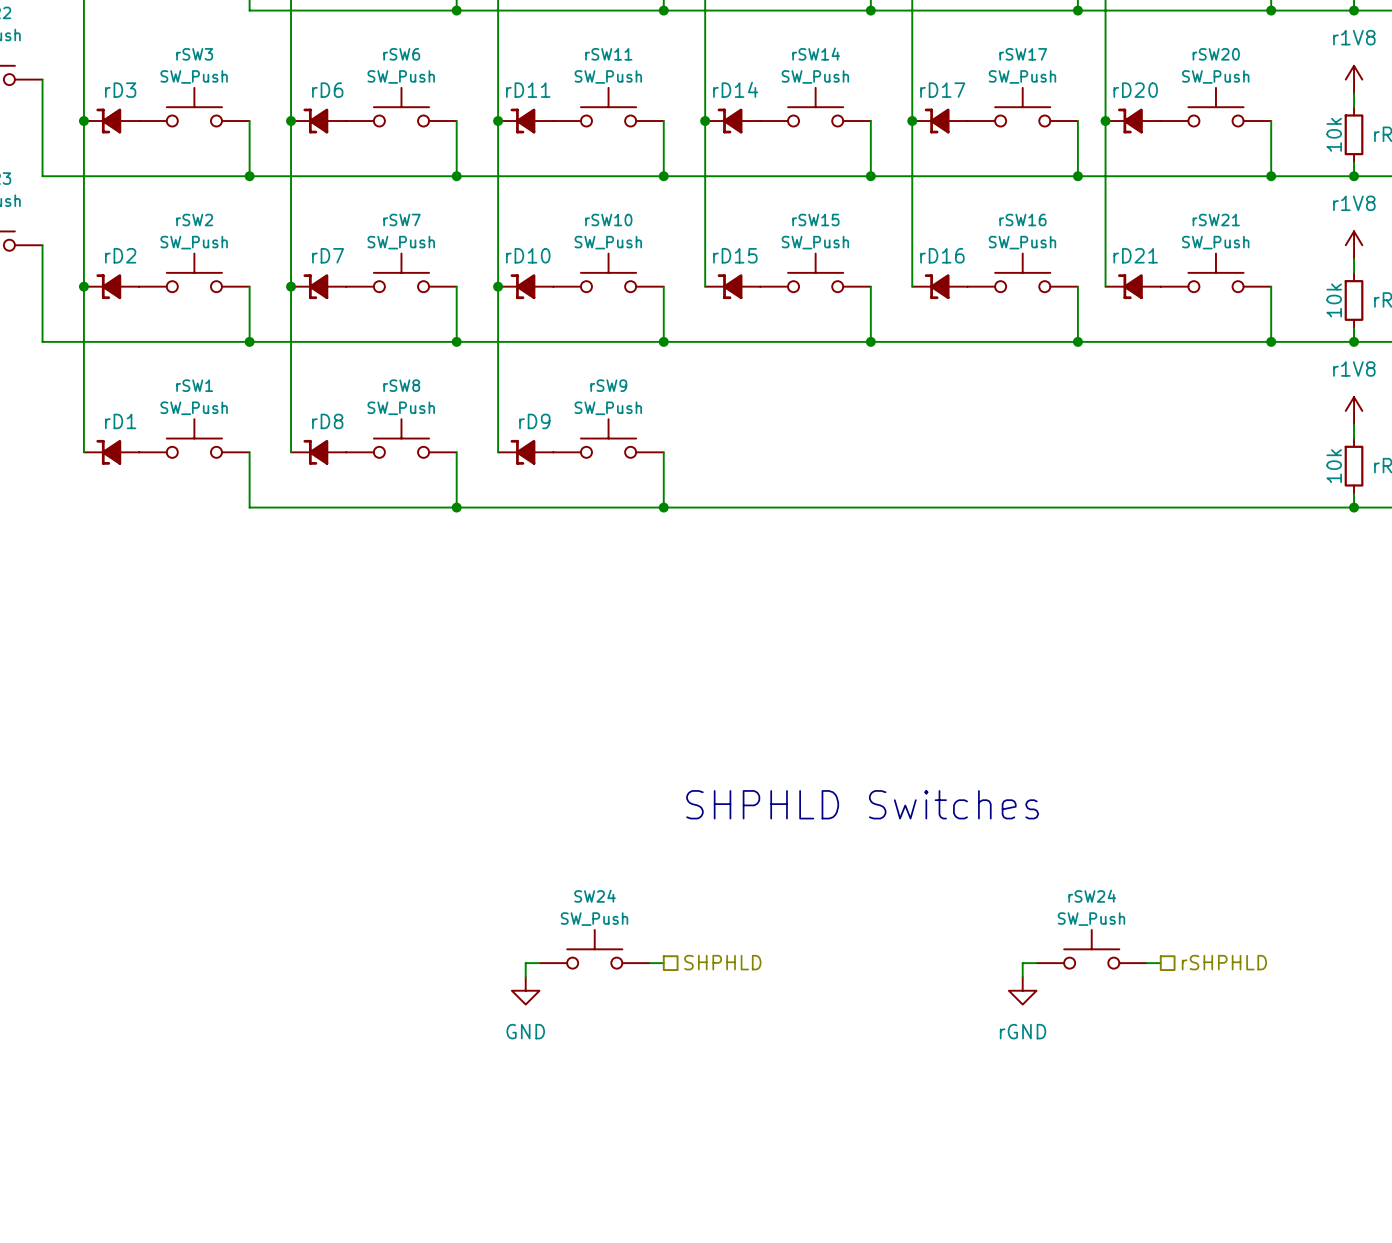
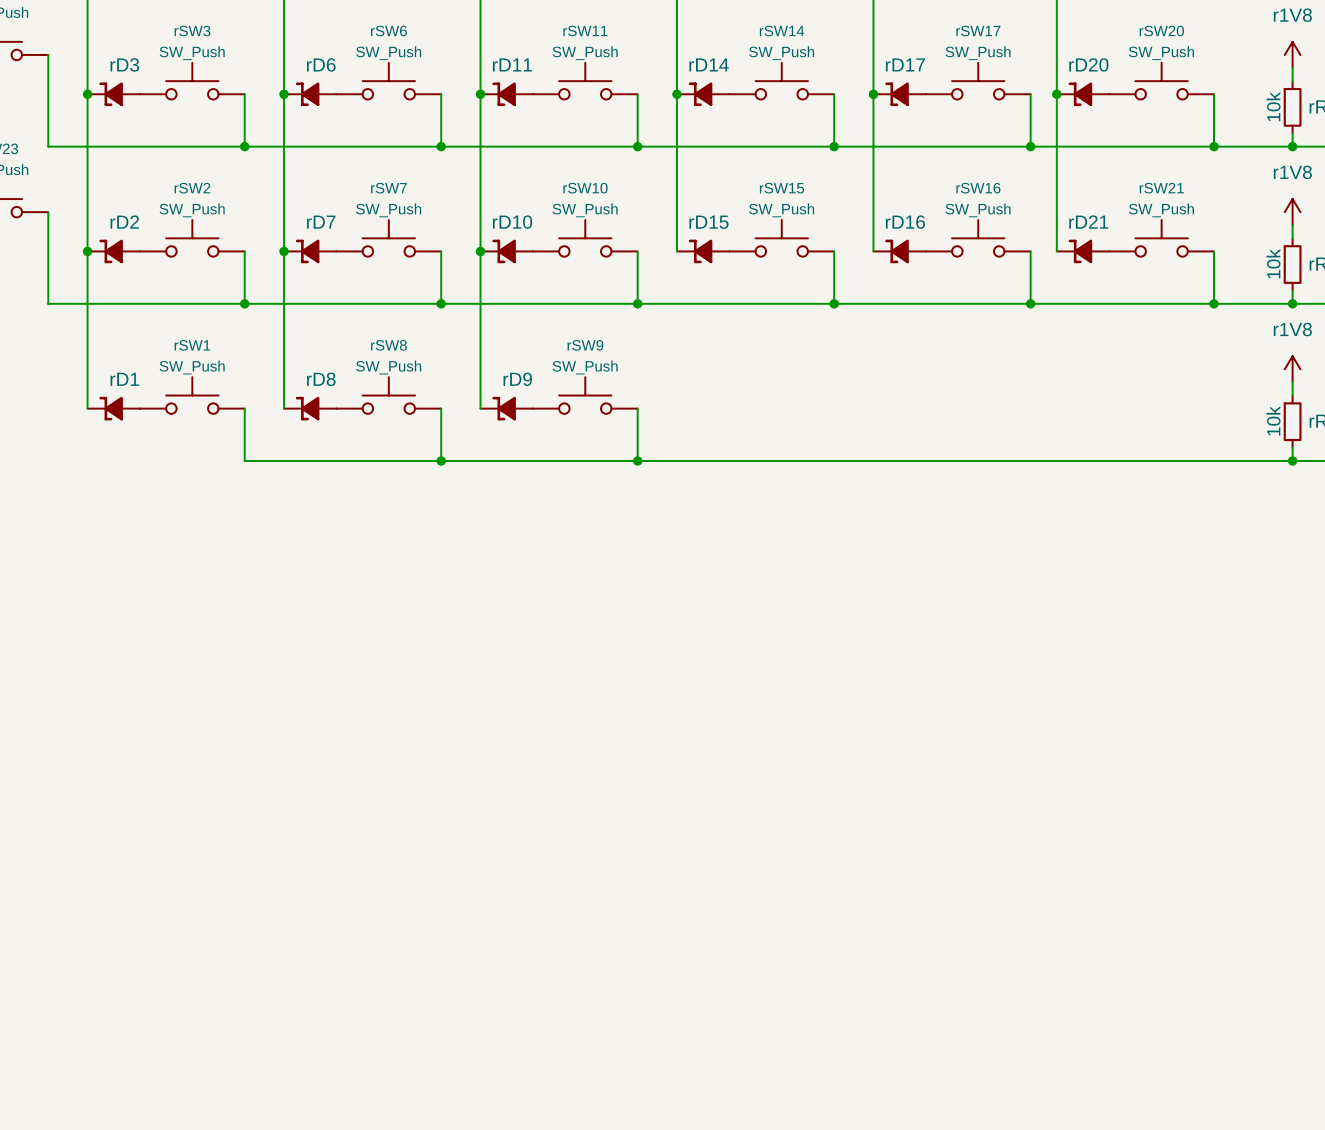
text: SHPHLD Switches (862, 804) -> none
SW24: SW_Push (594, 949) -> none
rSW24: SW_Push (1091, 949) -> none
hierarchical label: SHPHLD (722, 962) -> none
hierarchical label: rSHPHLD (1224, 962) -> none
wire: (539, 963) (525, 963) (525, 976) -> none
wire: (649, 963) (663, 963) -> none
wire: (1036, 963) (1022, 963) (1022, 976) -> none
wire: (1146, 963) (1160, 963) -> none
power symbol: GND (525, 990) -> none
power symbol: rGND (1022, 990) -> none

